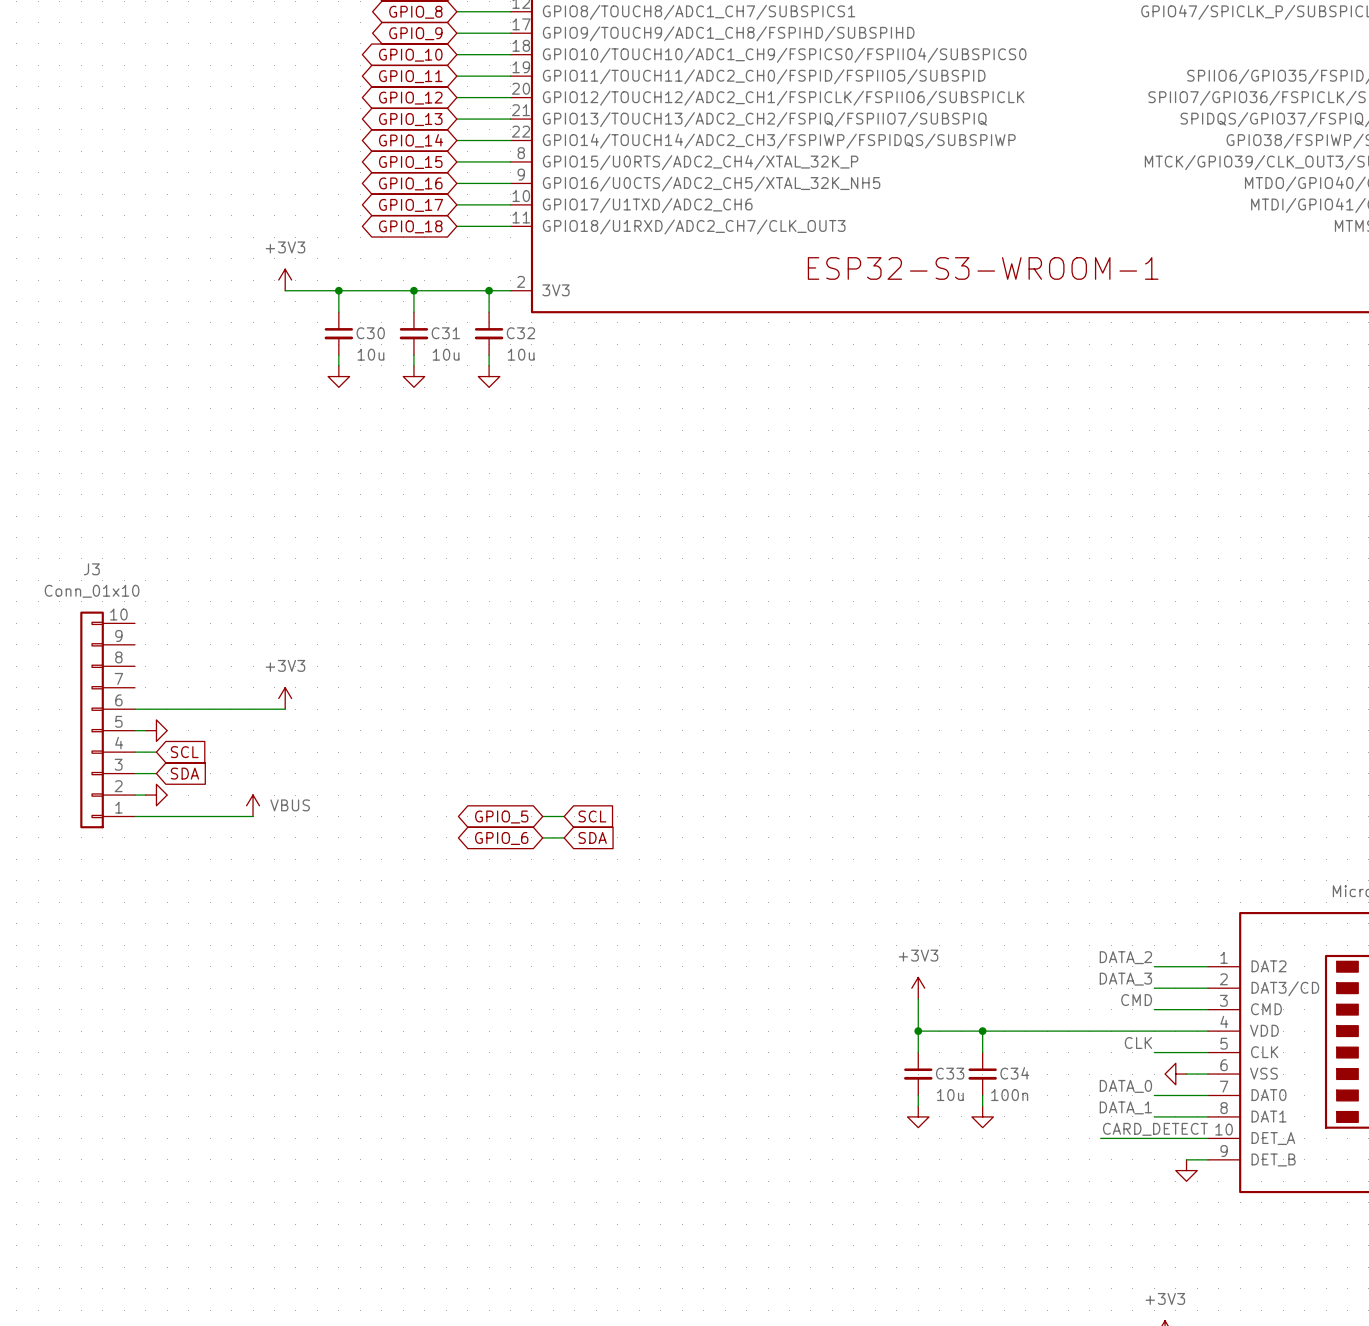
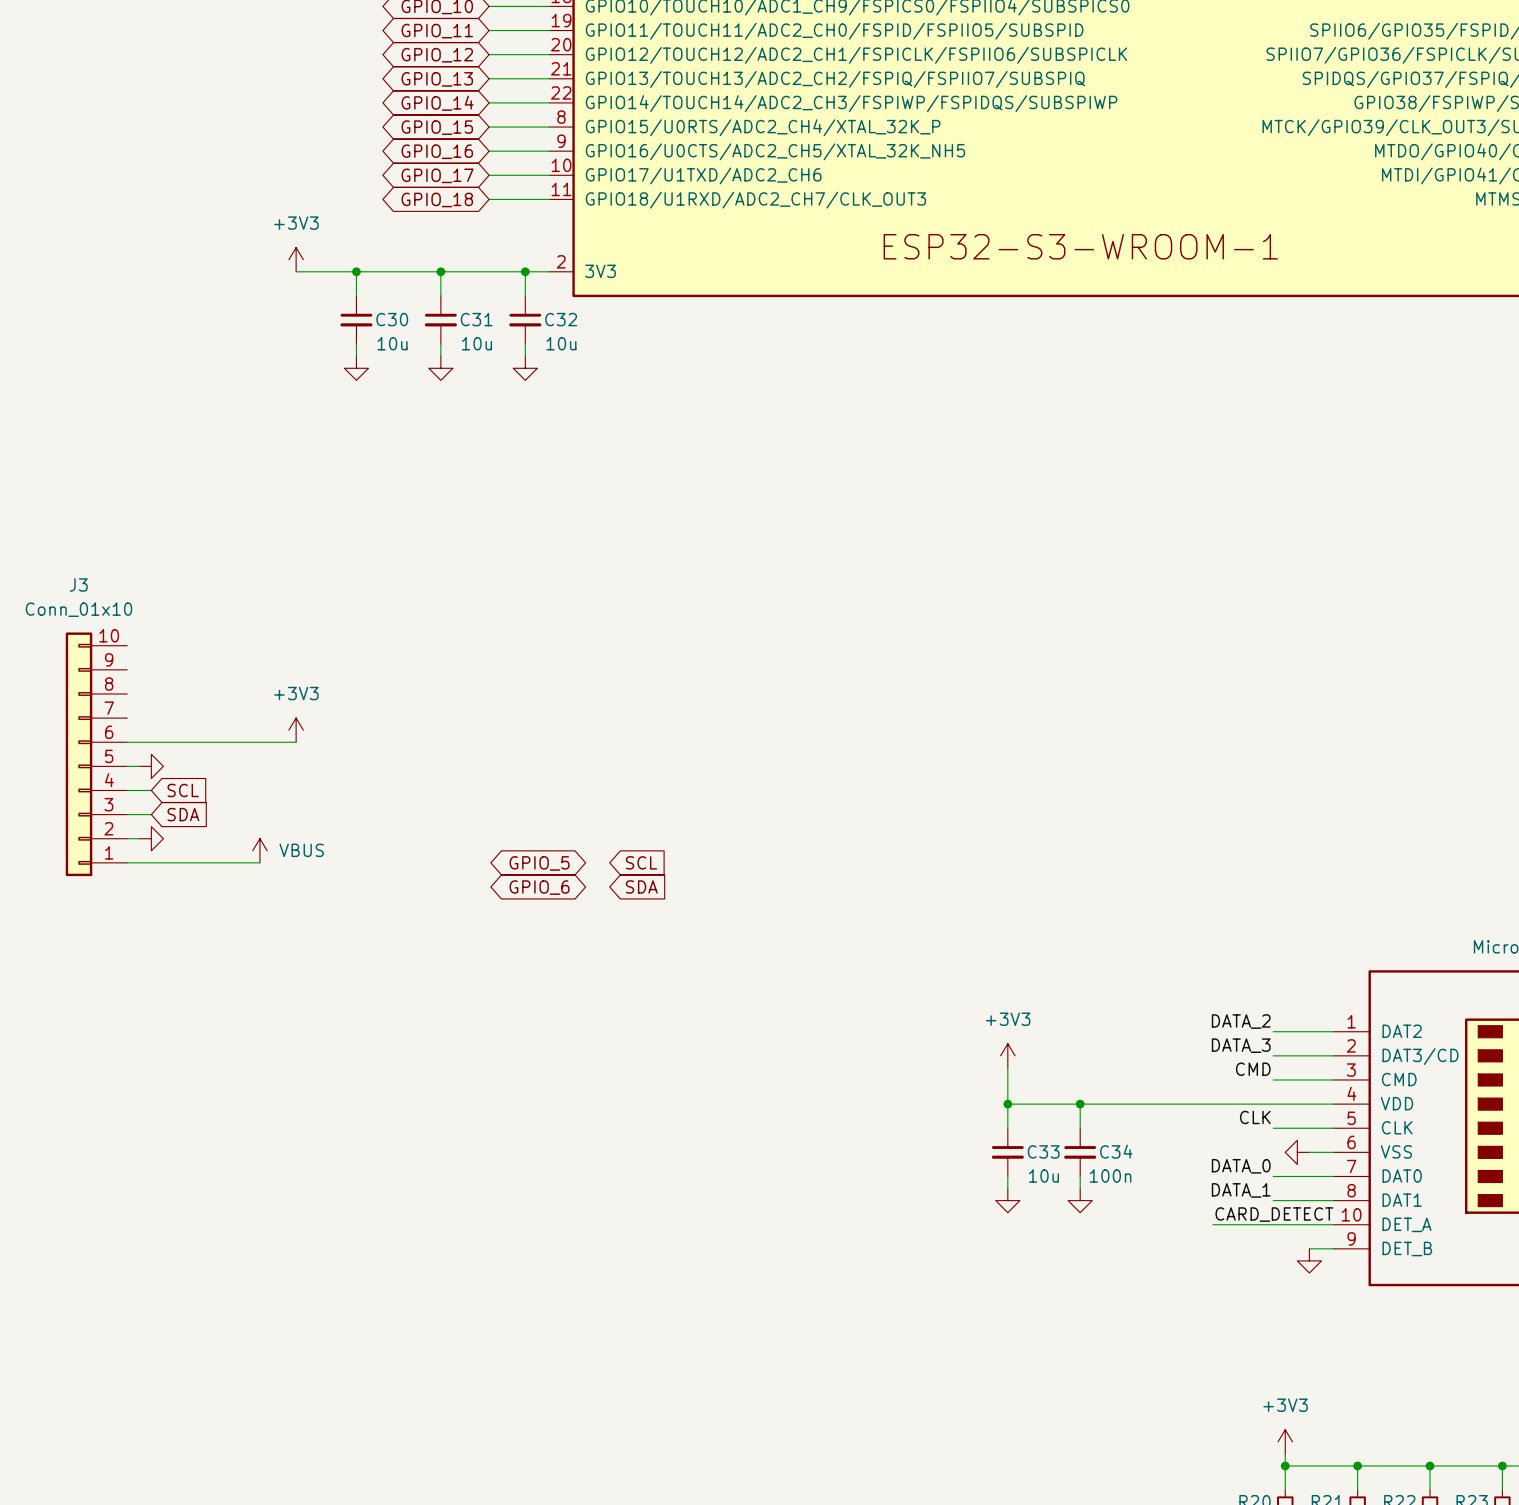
wire: (542, 816) (564, 816) -> none
wire: (542, 837) (564, 837) -> none

